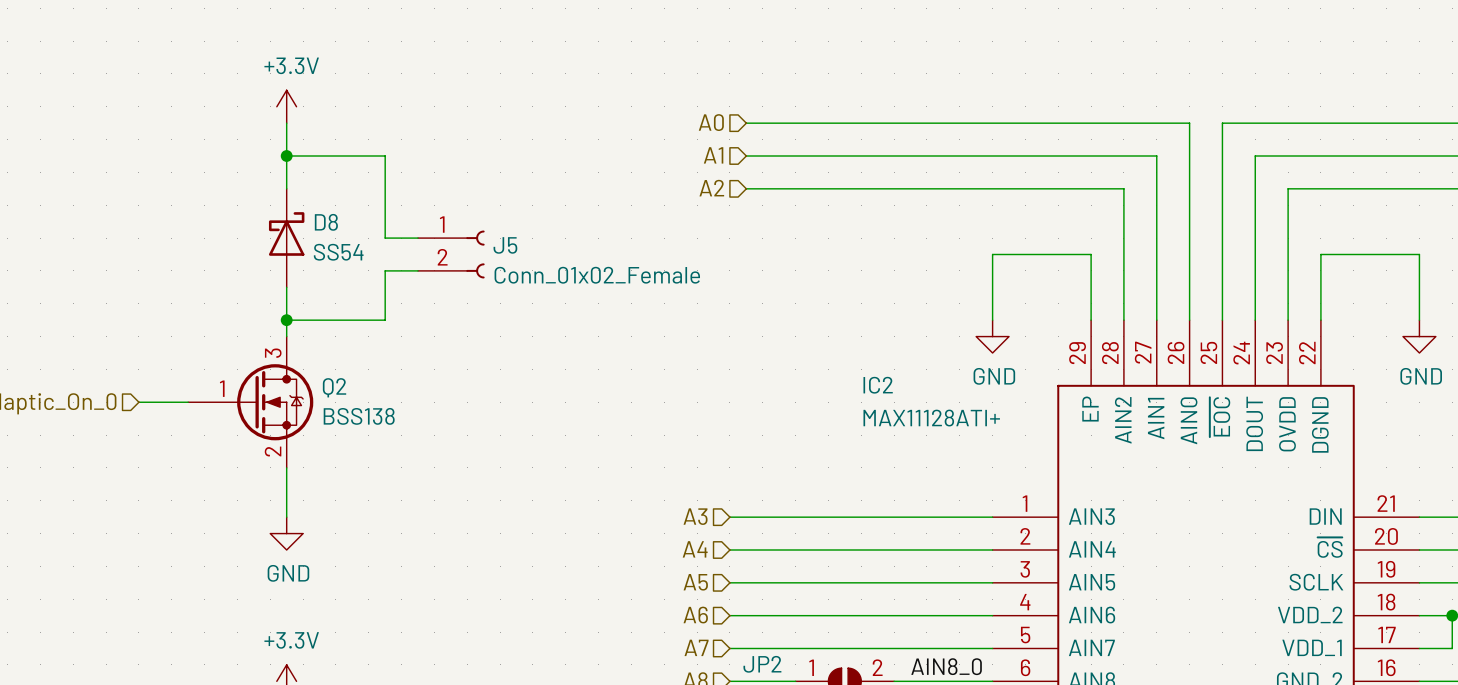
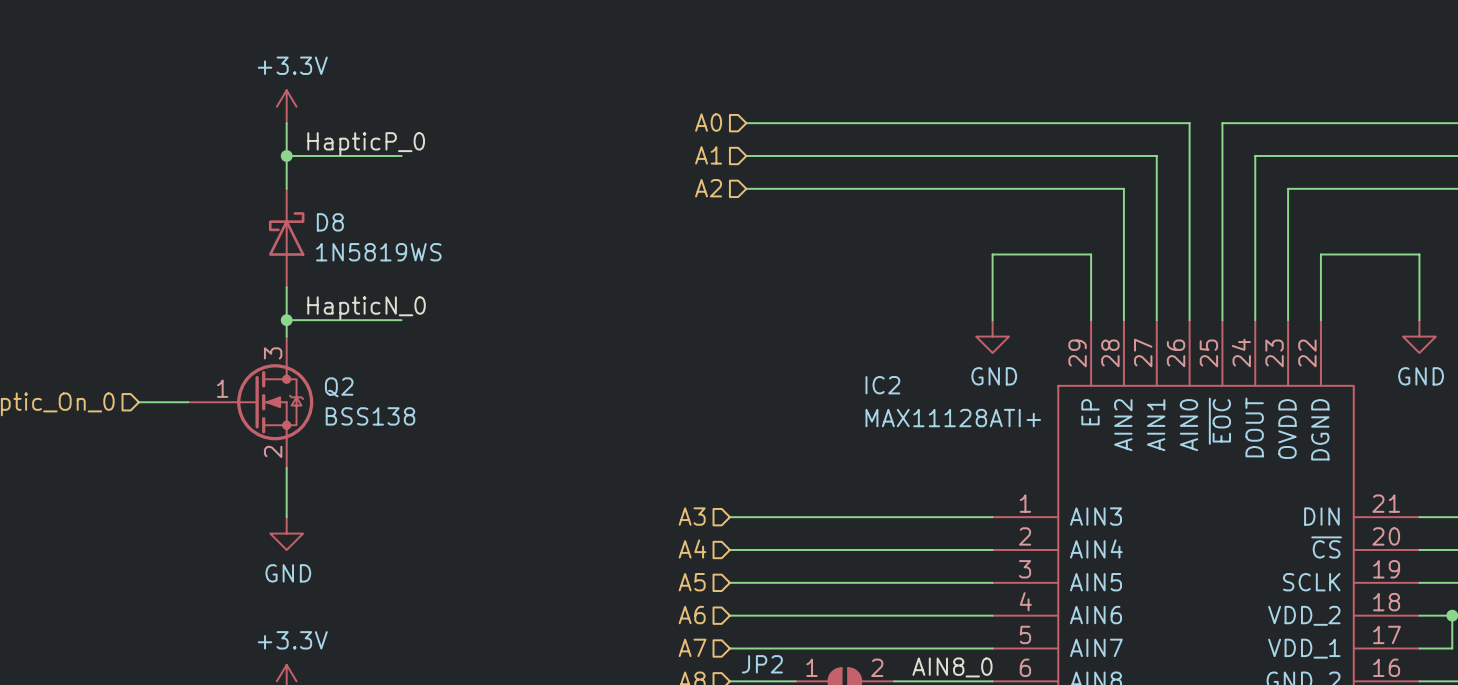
label: none -> HapticP_0 (366, 144)
wire: (385, 156) (385, 238) (418, 238) -> (385, 156) (401, 156)
D8 value: SS54 (338, 252) -> 1N5819WS (378, 252)
J5: Conn_01x02_Female (451, 254) -> none
wire: (418, 270) (385, 270) (385, 320) -> (401, 320) (385, 320)
label: none -> HapticN_0 (366, 308)

